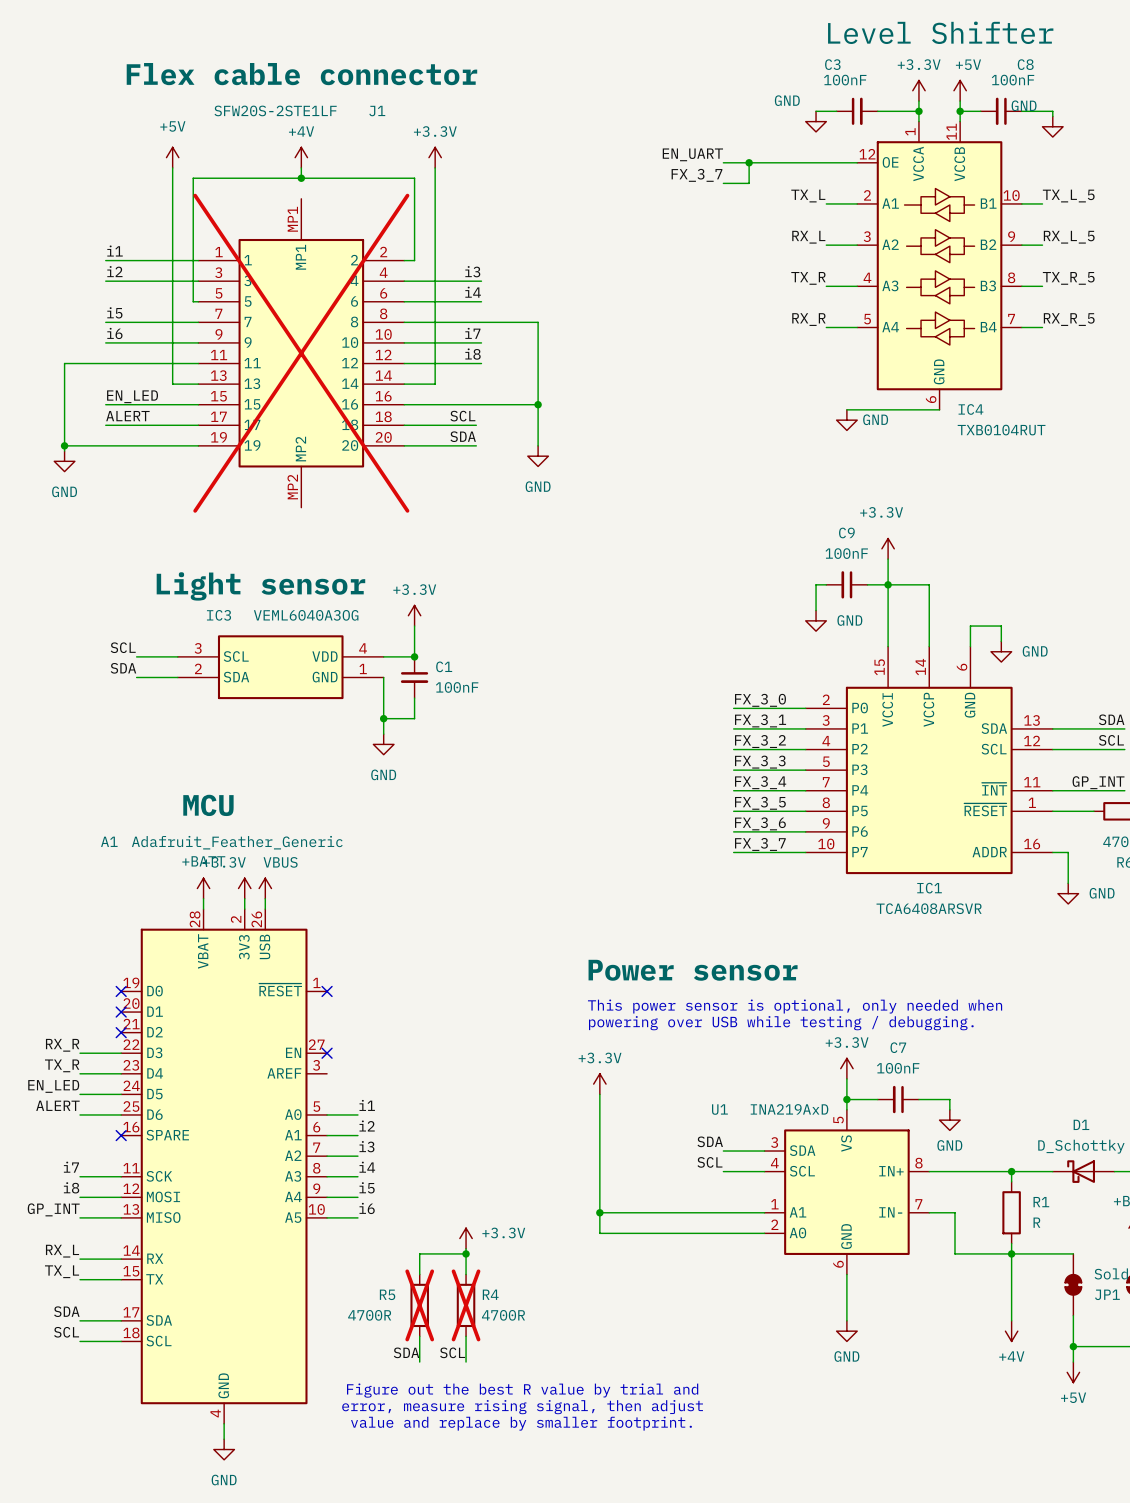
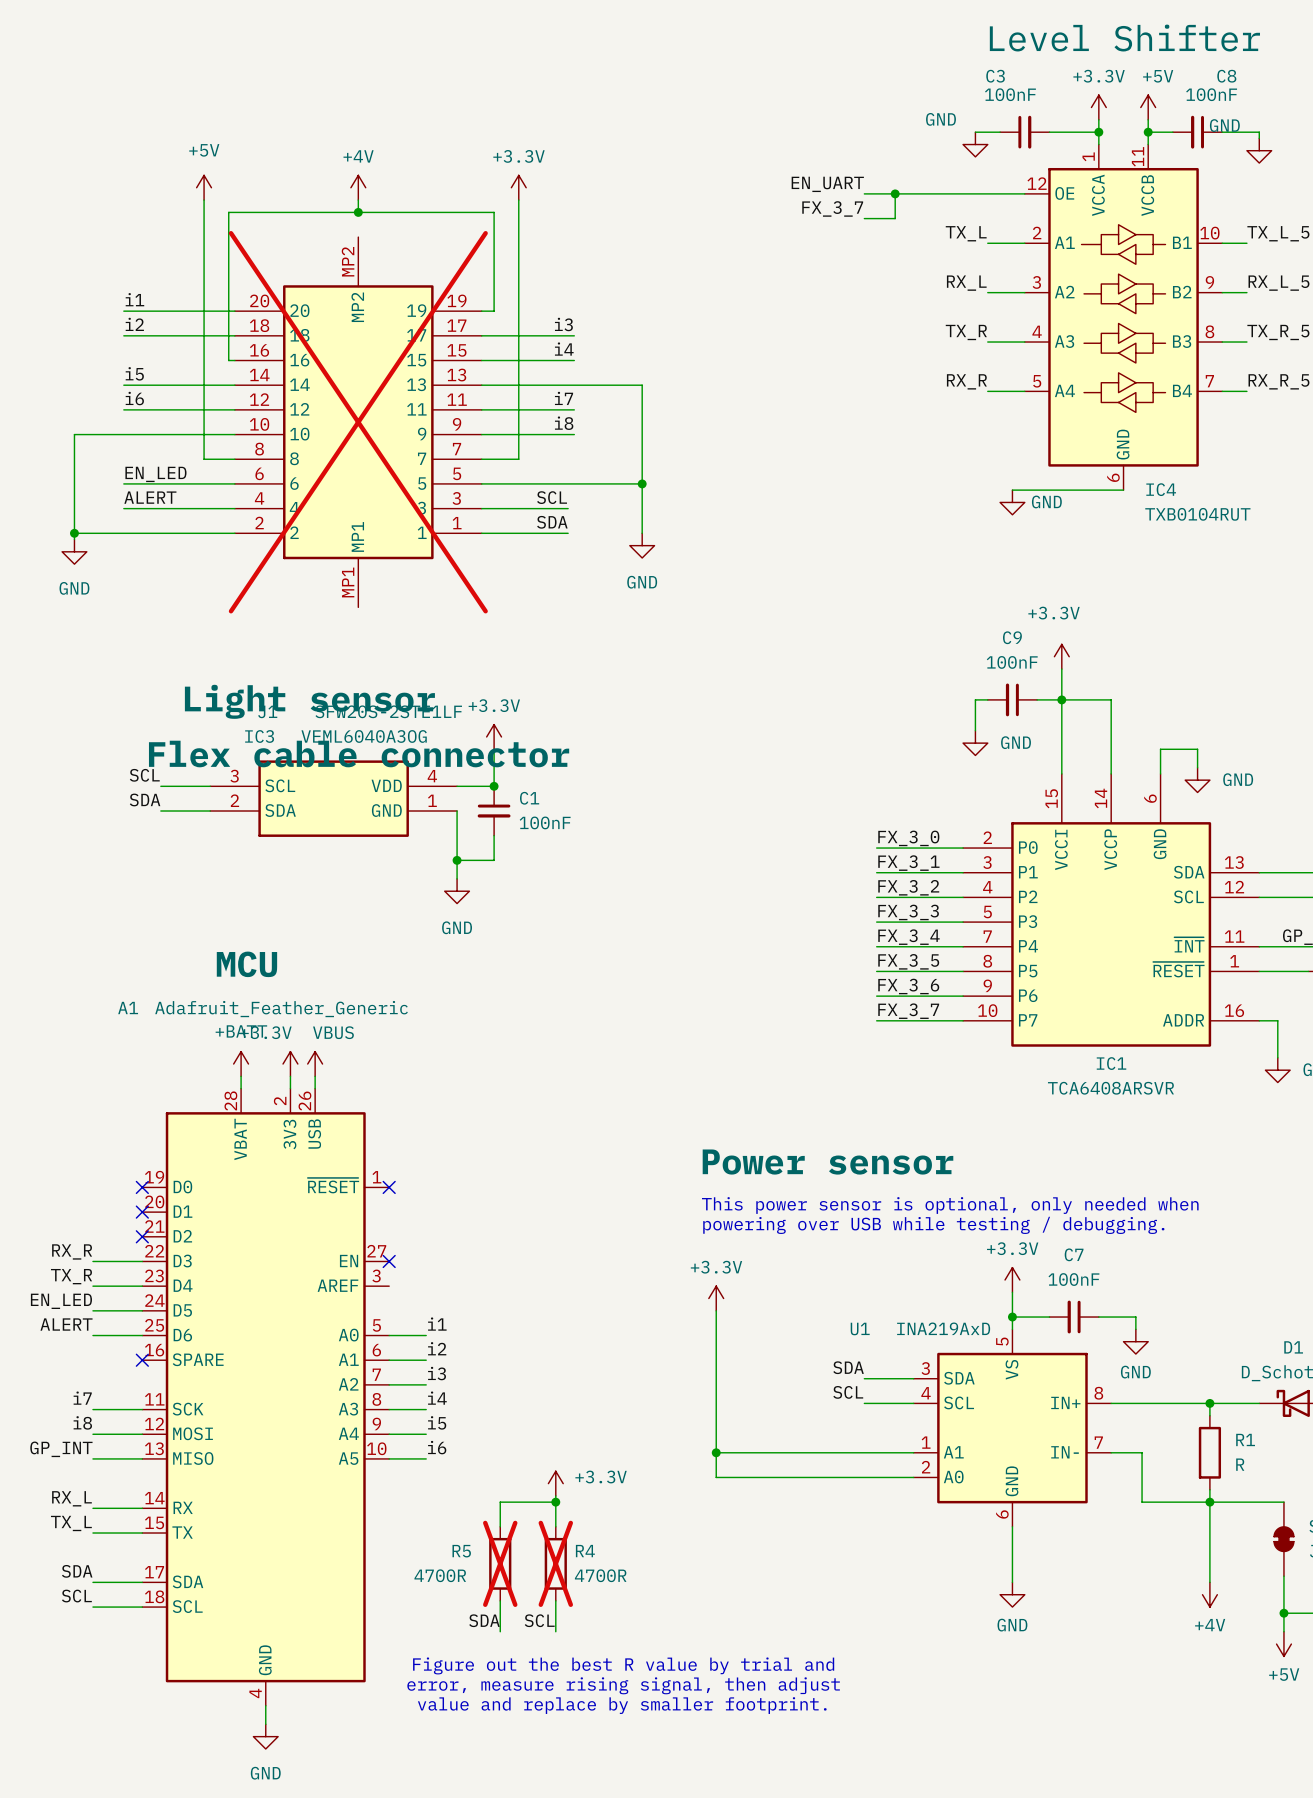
J1 rotation: 0° (301, 353) -> 180° (358, 422)

